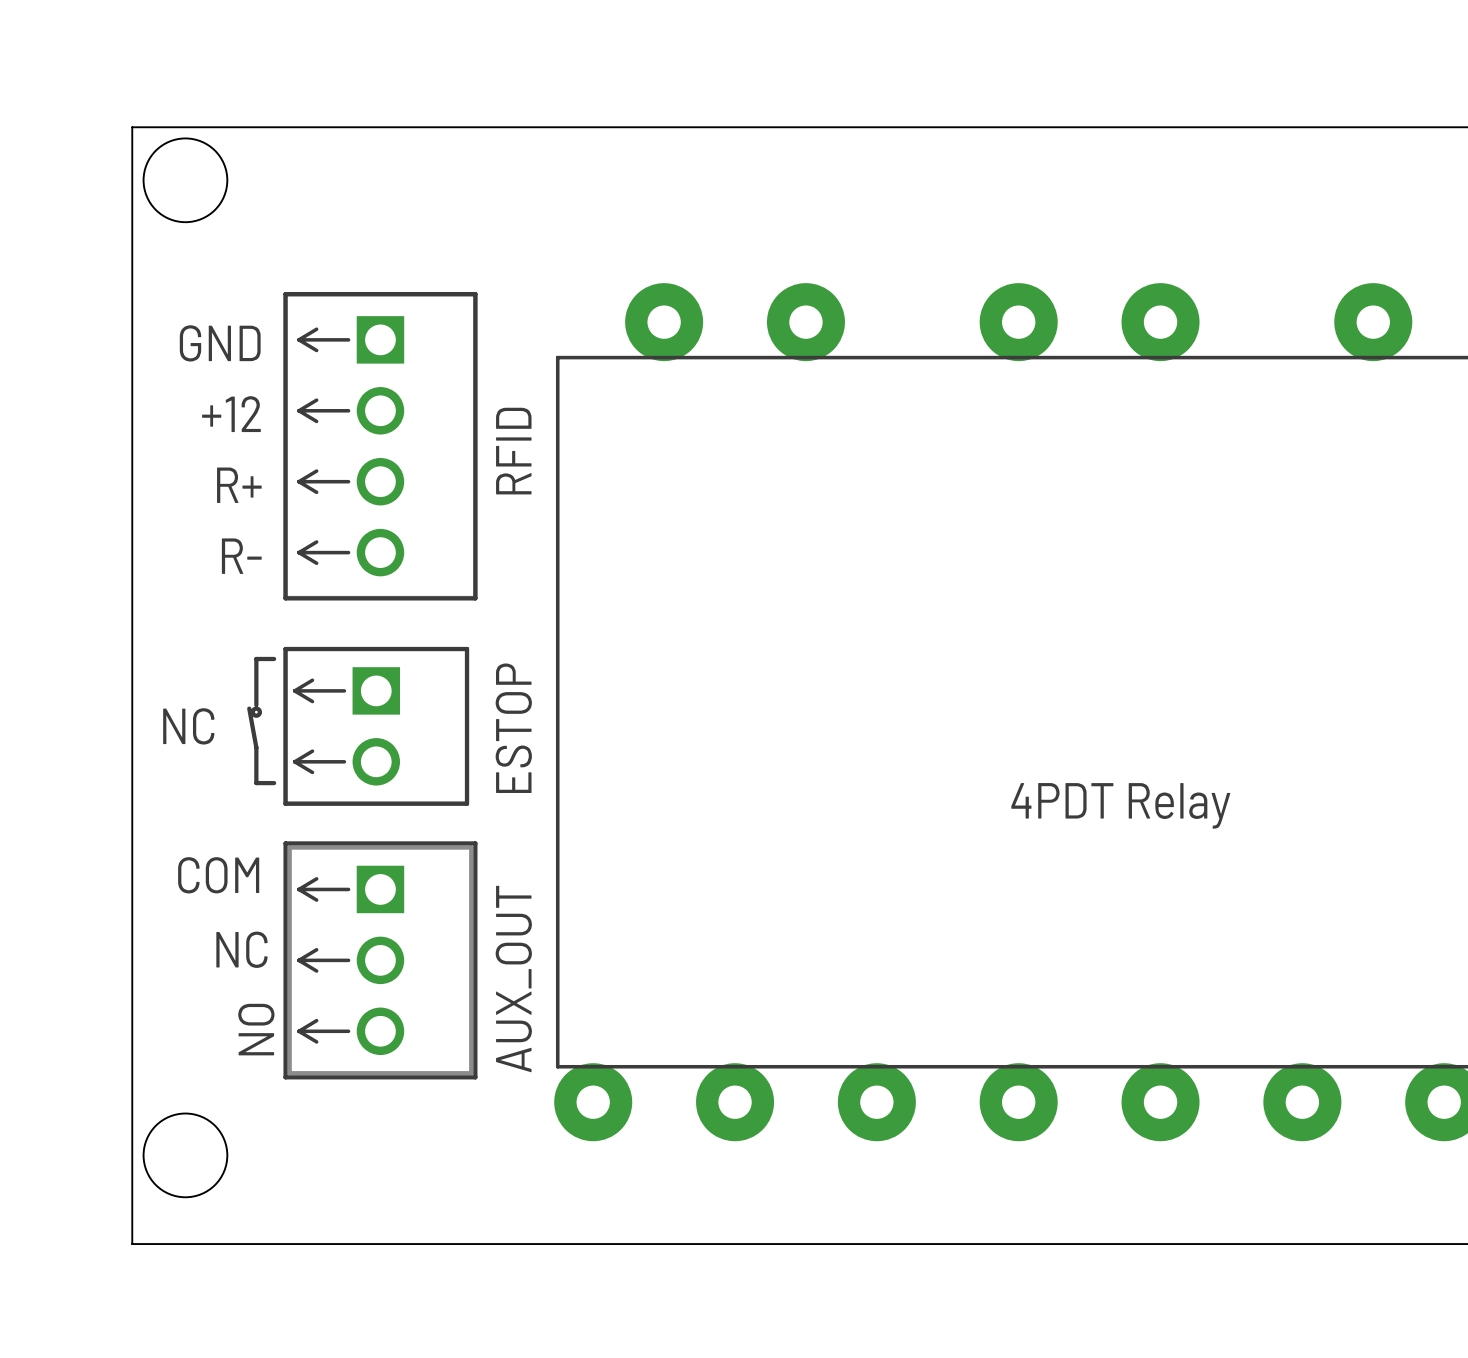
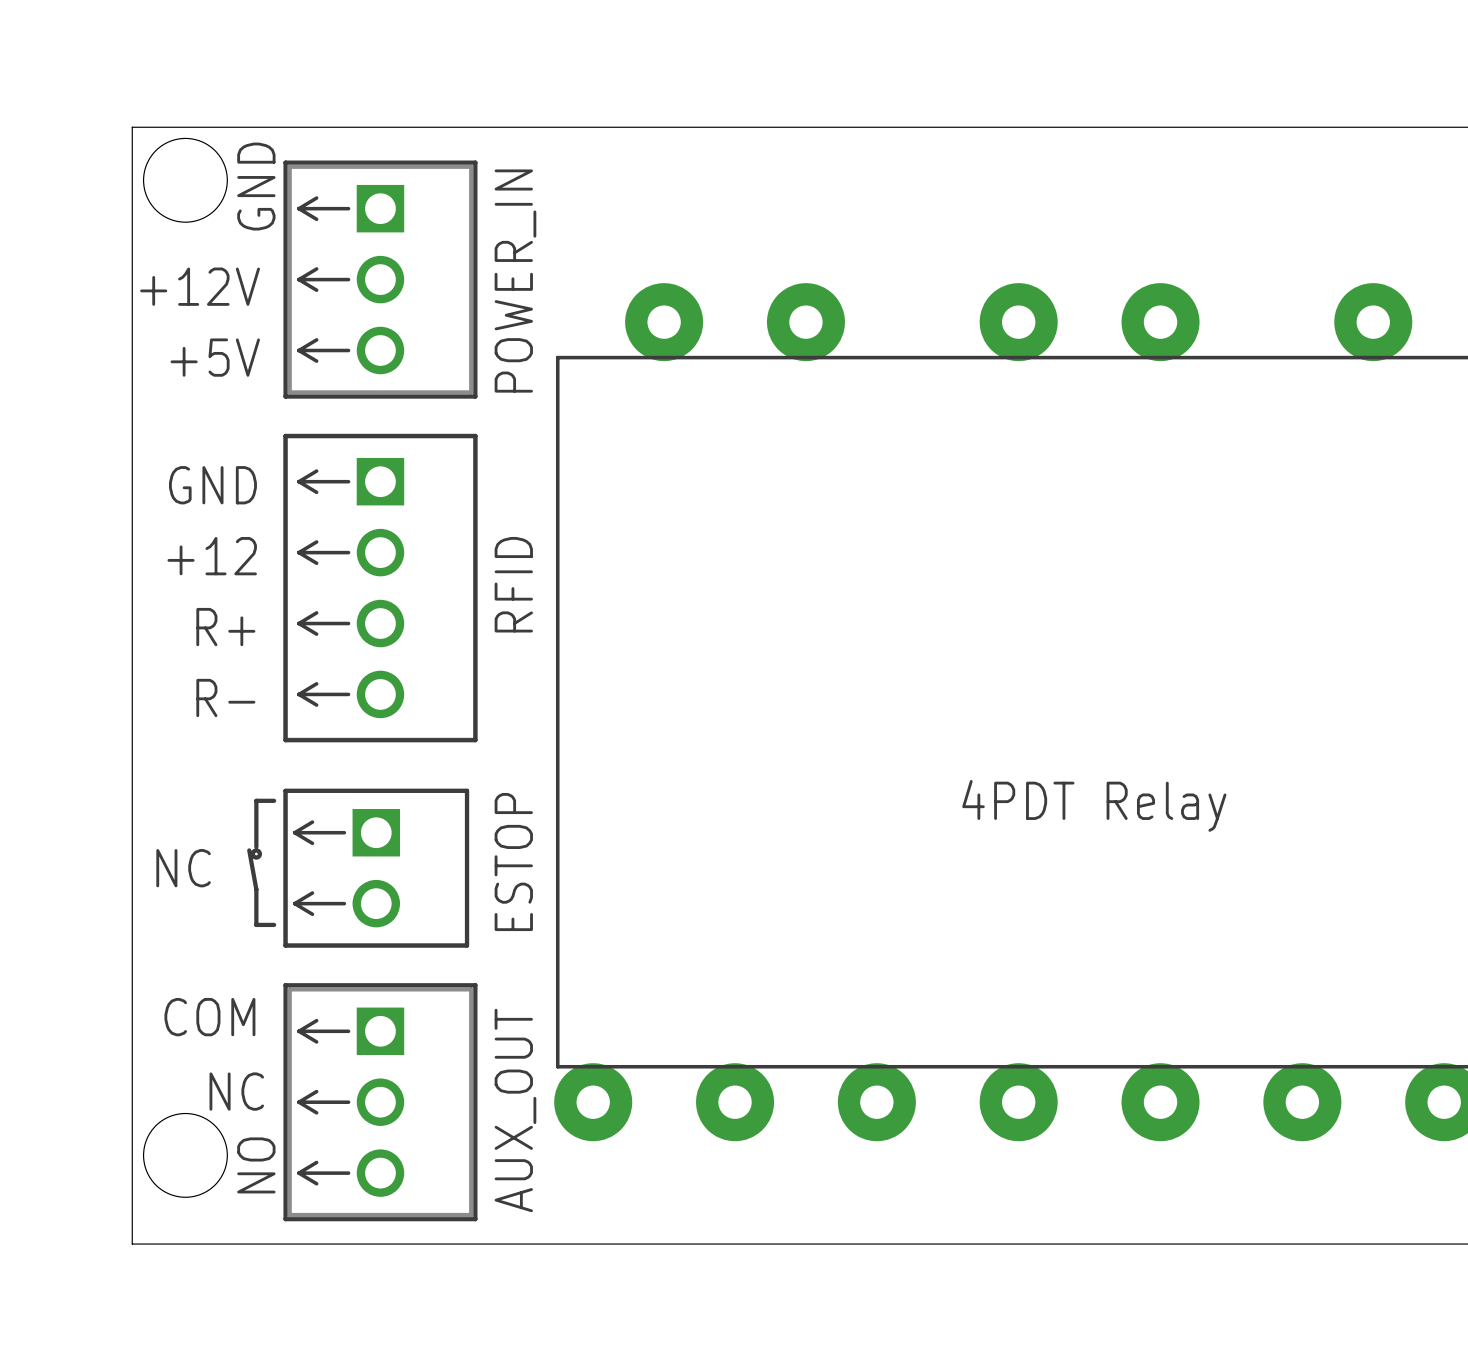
POWER_IN: none -> (380, 279)
text: none -> +12V (200, 286)
text rotation: 0° (220, 343) -> 90° counterclockwise (256, 186)
text position: GND (220, 343) -> GND (256, 186)
text: none -> +5V (215, 357)
text: +12 (231, 414) -> none
RFID position: (380, 446) -> (380, 588)
text: R+ (239, 485) -> GND (212, 485)
text: R- (241, 556) -> +12 (212, 556)
text: none -> R+ (225, 627)
line: (274, 658) (256, 658) (256, 705) -> (274, 800) (256, 800) (256, 846)
text: none -> R- (225, 697)
line: (249, 708) (256, 747) (256, 783) (274, 783) -> (249, 850) (256, 889) (256, 924) (274, 924)
drawing position: (256, 712) -> (256, 854)
text: NC (188, 726) -> none
ESTOP position: (376, 726) -> (376, 868)
text: none -> NC (183, 868)
text position: COM (218, 875) -> COM (209, 1017)
text: NC (241, 949) -> none
AUX_OUT position: (380, 960) -> (380, 1102)
text position: NO (256, 1029) -> NO (256, 1165)
text: none -> NC (236, 1091)

